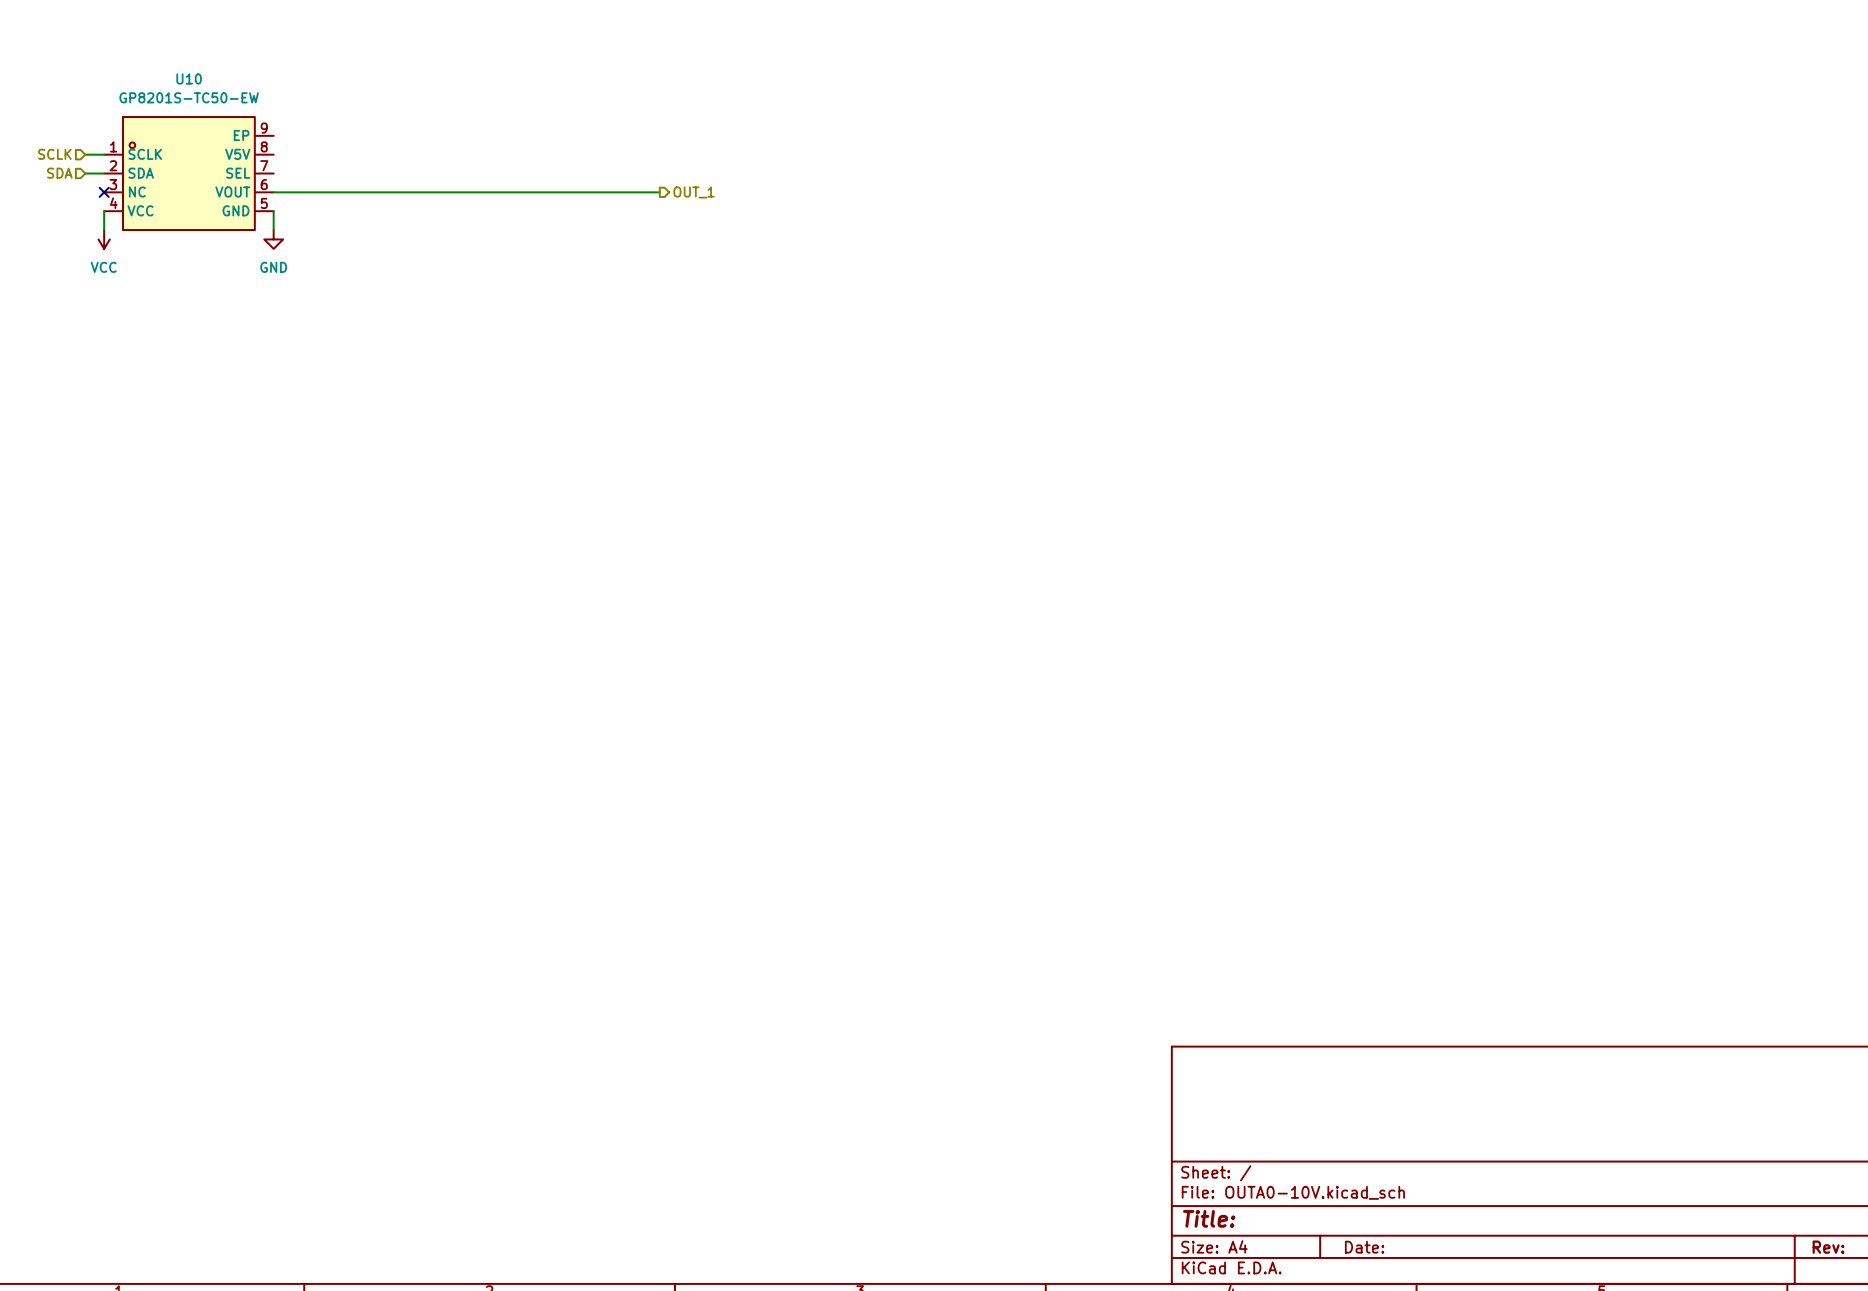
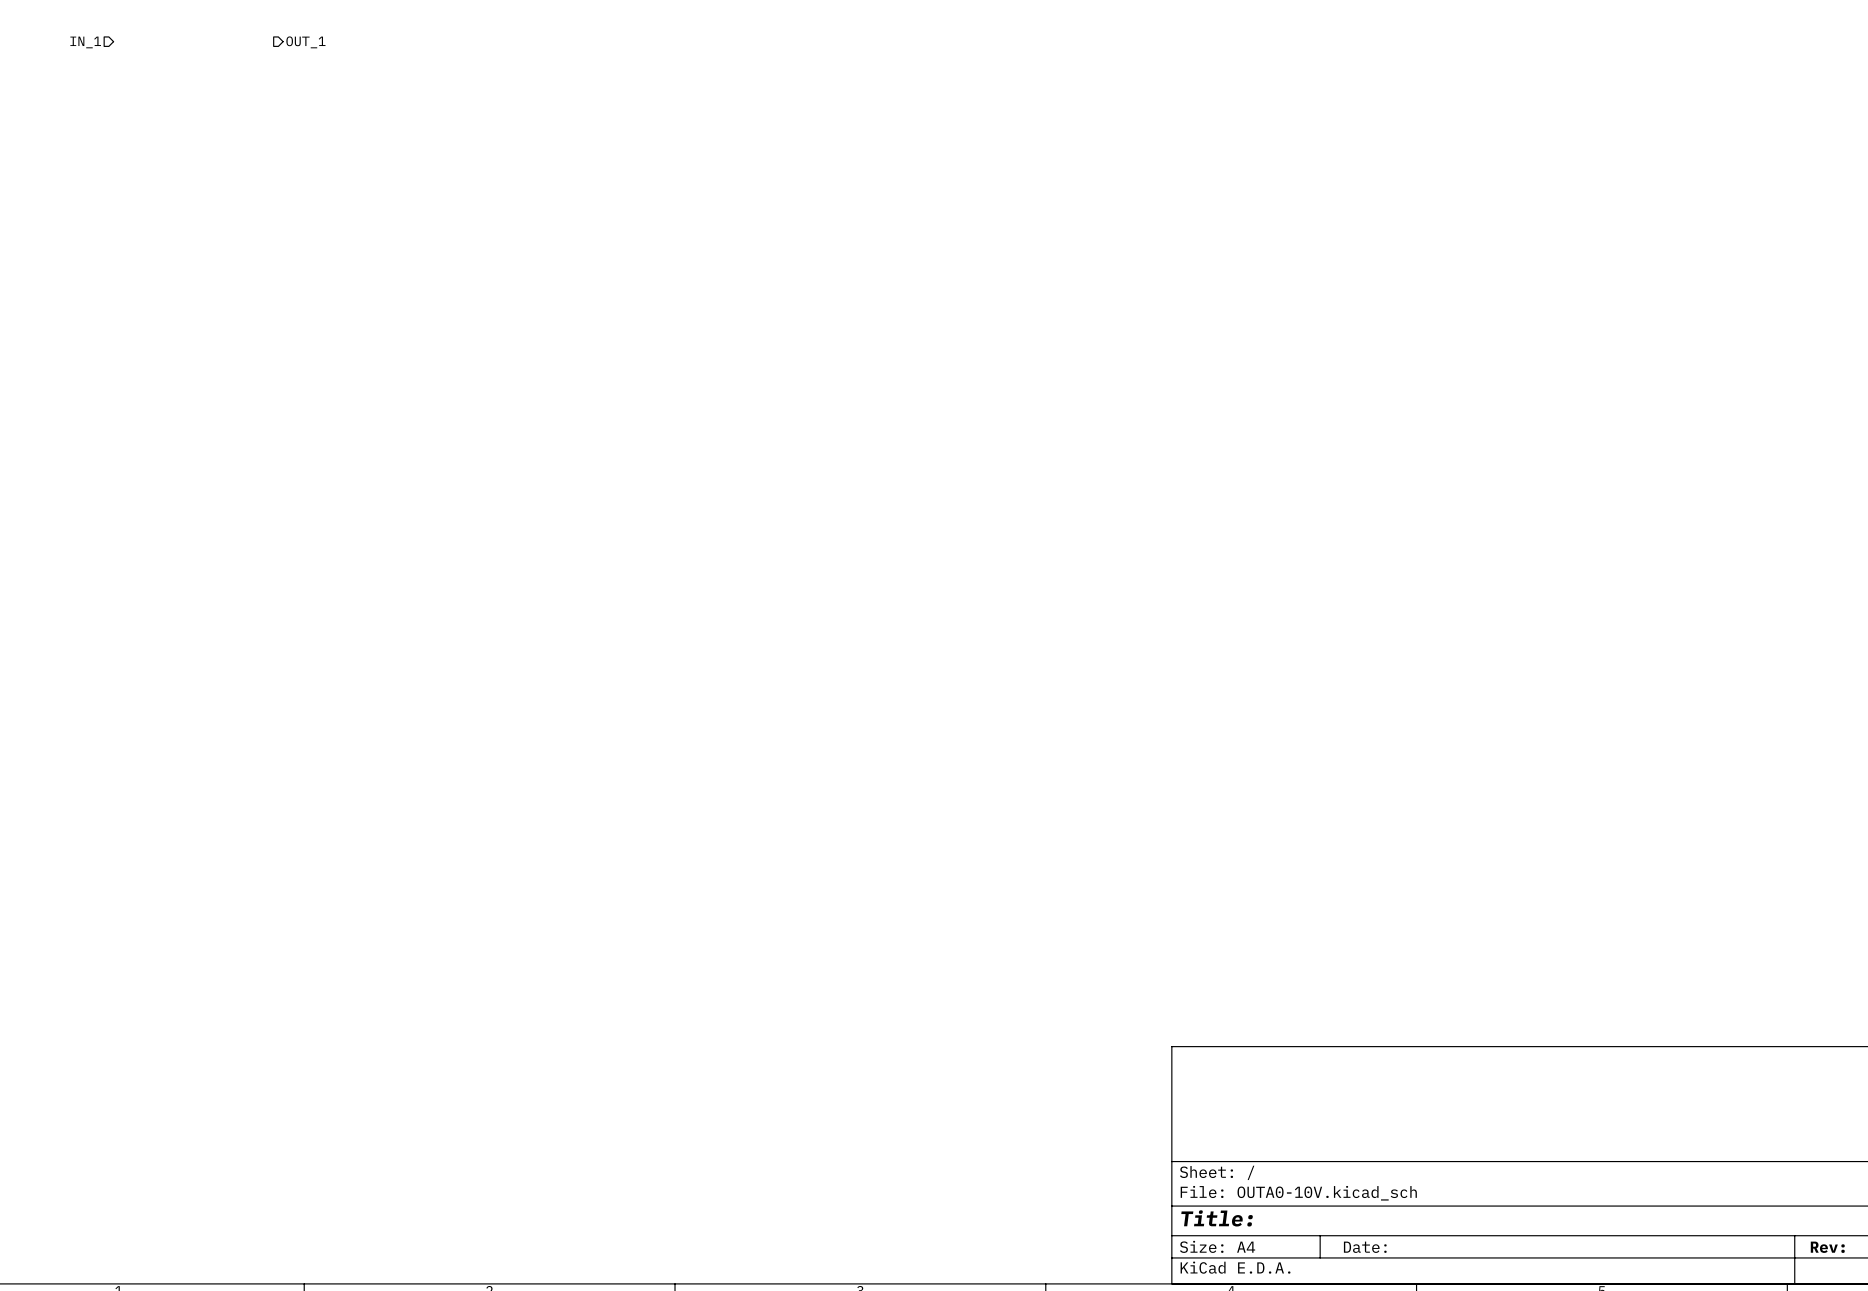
hierarchical label: none -> IN_1 (85, 42)
hierarchical label: none -> OUT_1 (305, 42)
hierarchical label: SCLK (54, 154) -> none
wire: (85, 154) (104, 154) -> none
hierarchical label: SDA (59, 173) -> none
wire: (85, 173) (104, 173) -> none
U10: GP8201S-TC50-EW (188, 173) -> none
no-connect mark: (104, 192) -> none
wire: (273, 192) (659, 192) -> none
hierarchical label: OUT_1 (694, 192) -> none
wire: (104, 211) (104, 230) -> none
wire: (273, 211) (273, 230) -> none
power symbol: VCC (104, 239) -> none
power symbol: GND (273, 239) -> none

